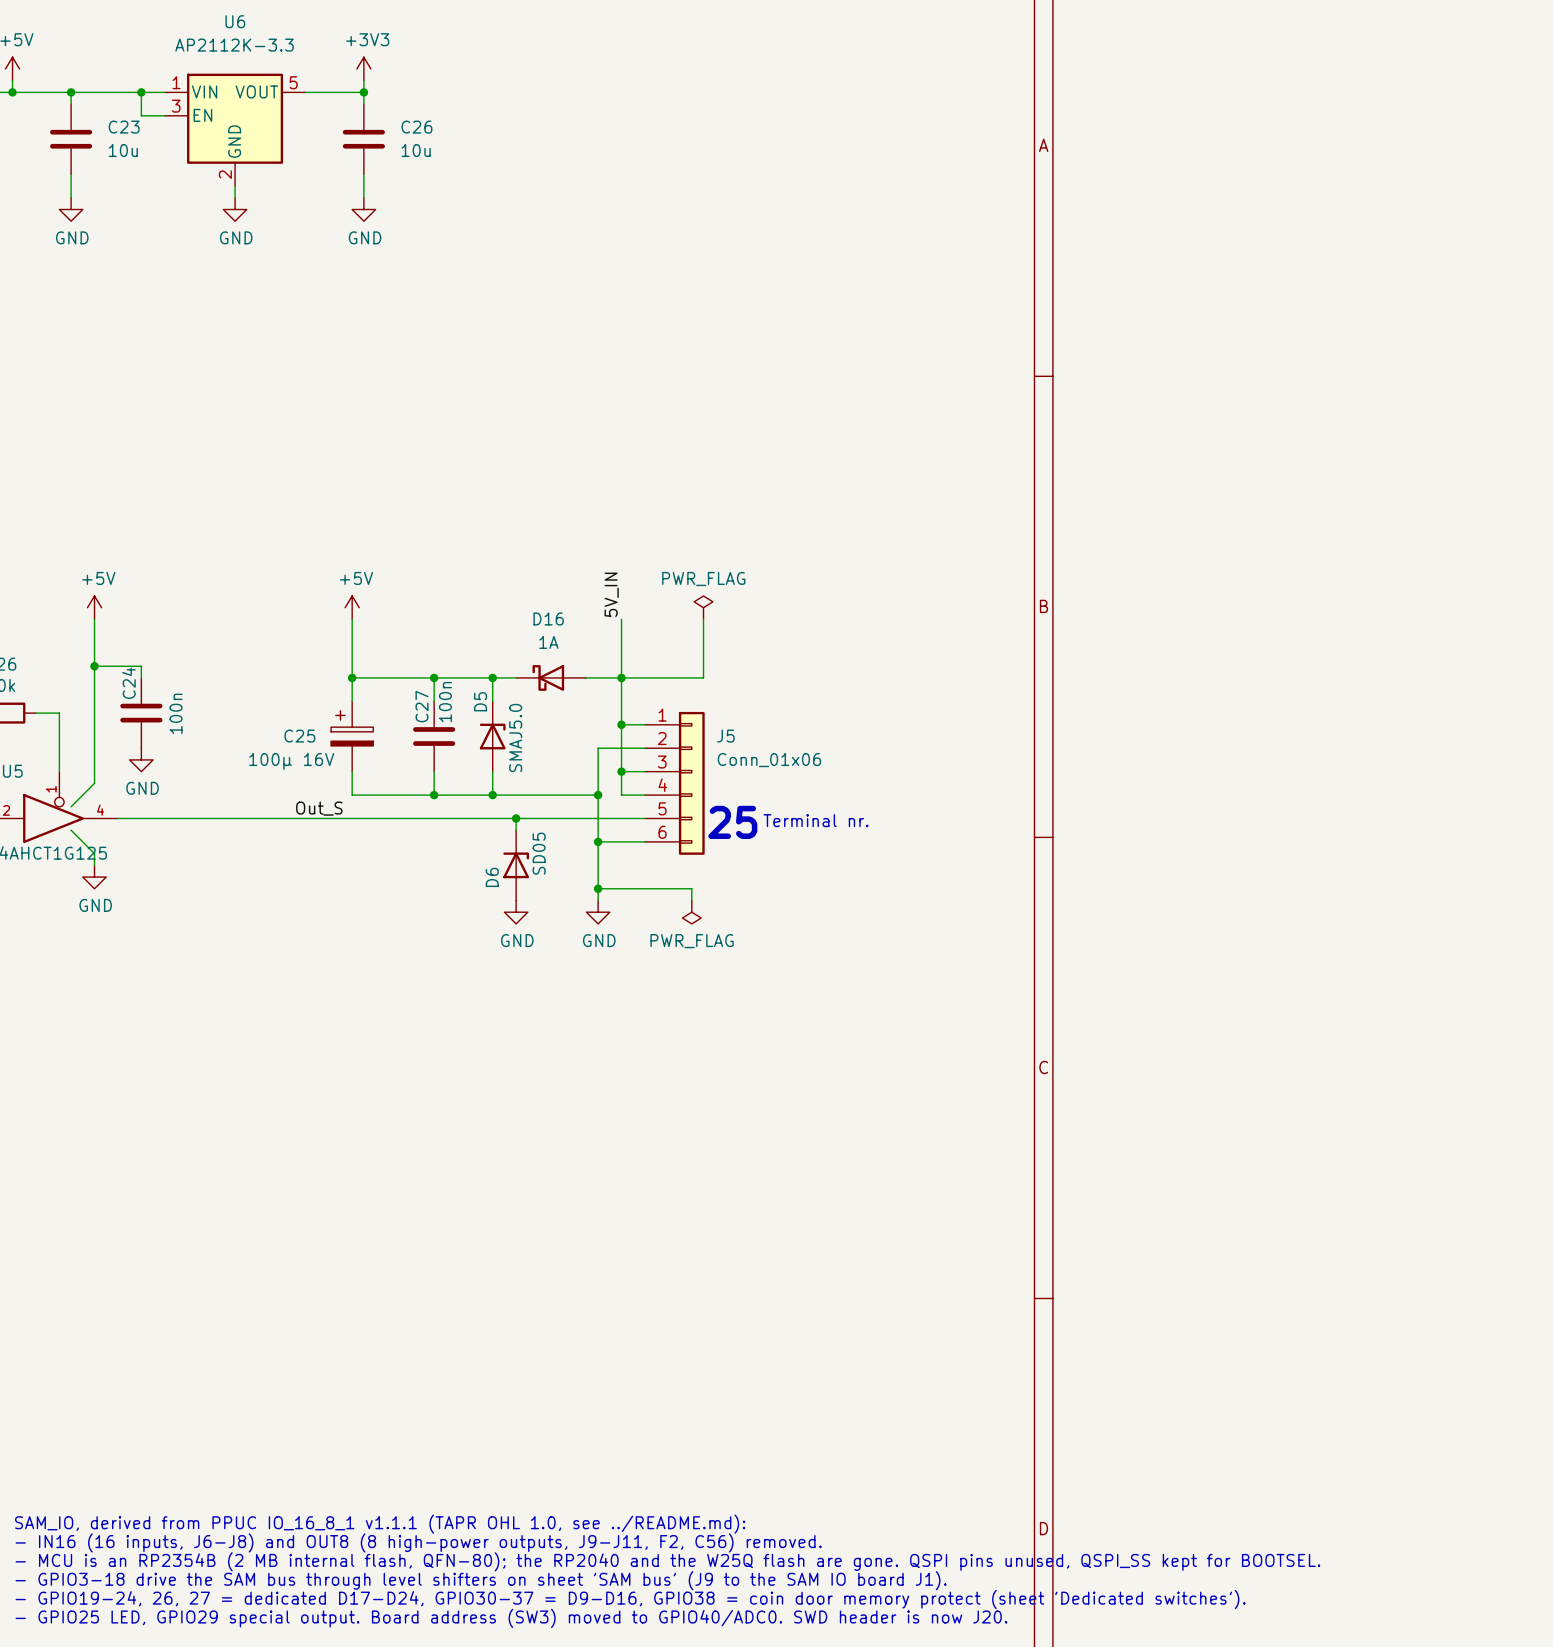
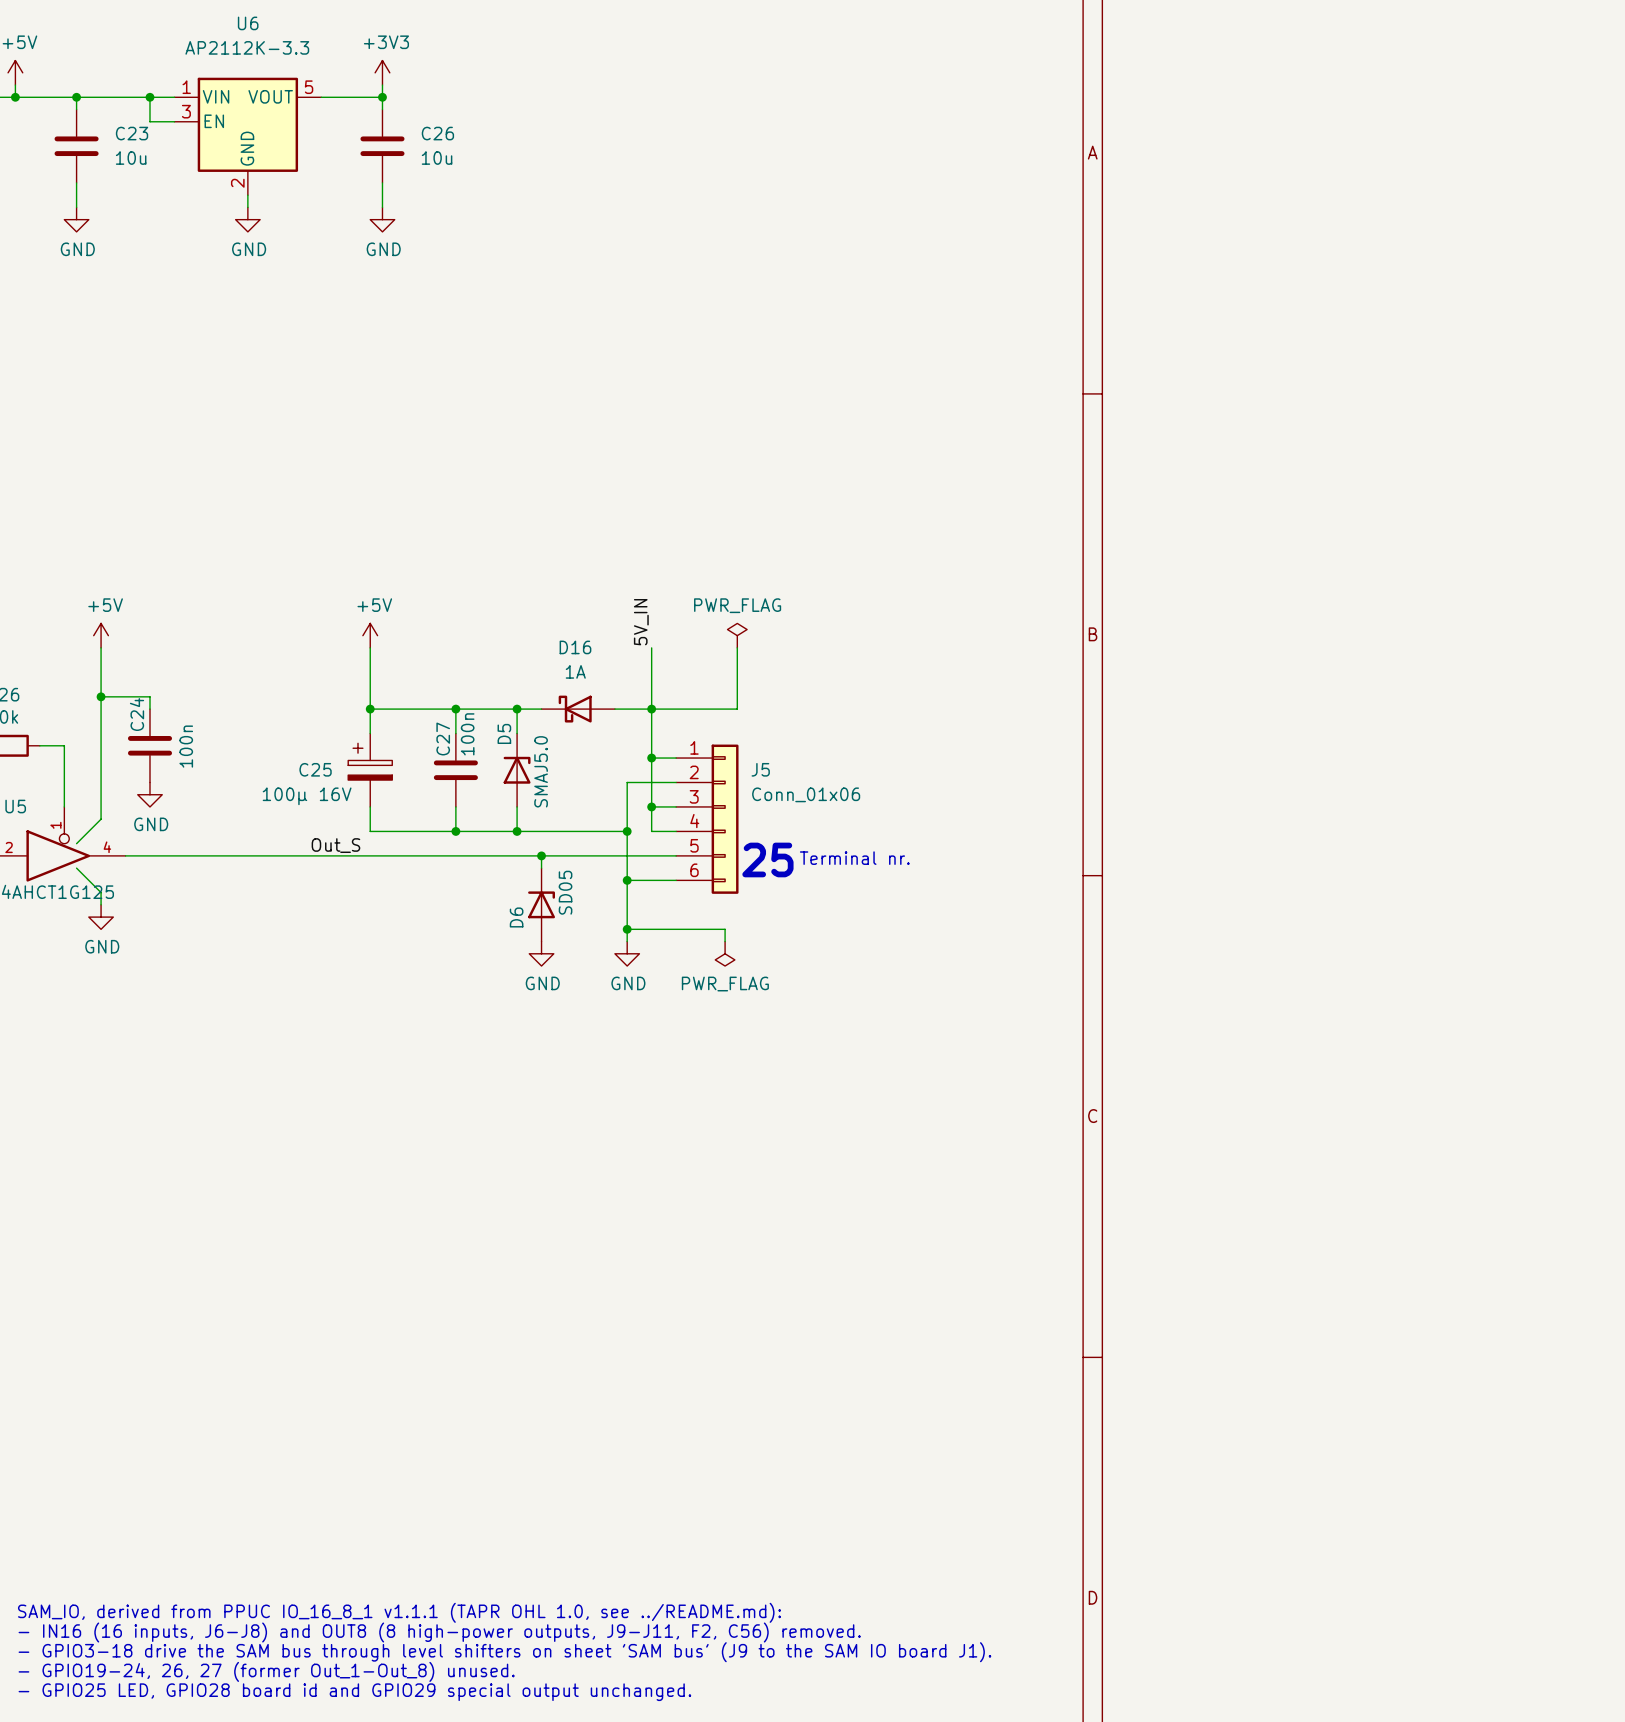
text: SAM_IO, derived from PPUC IO_16_8_1 v1.1.1 (TAPR OHL 1.0, see ../README.md): (380, 1524) -> none
text: - IN16 (16 inputs, J6-J8) and OUT8 (8 high-power outputs, J9-J11, F2, C56) removed. (418, 1542) -> SAM_IO, derived from PPUC IO_16_8_1 v1.1.1 (TAPR OHL 1.0, see ../README.md): (399, 1612)
text: - MCU is an RP2354B (2 MB internal flash, QFN-80); the RP2040 and the W25Q flash are gone. QSPI pins unused, QSPI_SS kept for BOOTSEL. (667, 1561) -> - IN16 (16 inputs, J6-J8) and OUT8 (8 high-power outputs, J9-J11, F2, C56) removed. (439, 1632)
text: - GPIO19-24, 26, 27 = dedicated D17-D24, GPIO30-37 = D9-D16, GPIO38 = coin door memory protect (sheet 'Dedicated switches'). (630, 1599) -> - GPIO19-24, 26, 27 (former Out_1-Out_8) unused. (266, 1671)
text: - GPIO25 LED, GPIO29 special output. Board address (SW3) moved to GPIO40/ADC0. SWD header is now J20. (511, 1618) -> - GPIO25 LED, GPIO28 board id and GPIO29 special output unchanged. (354, 1692)

